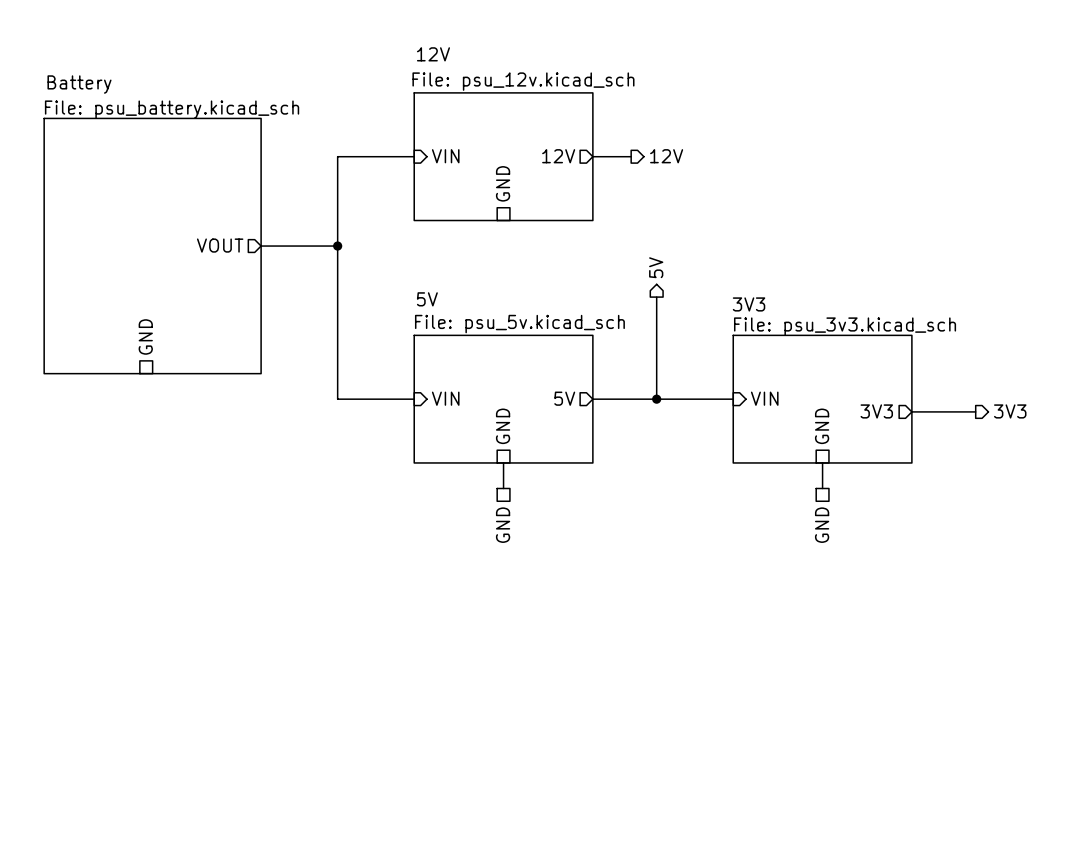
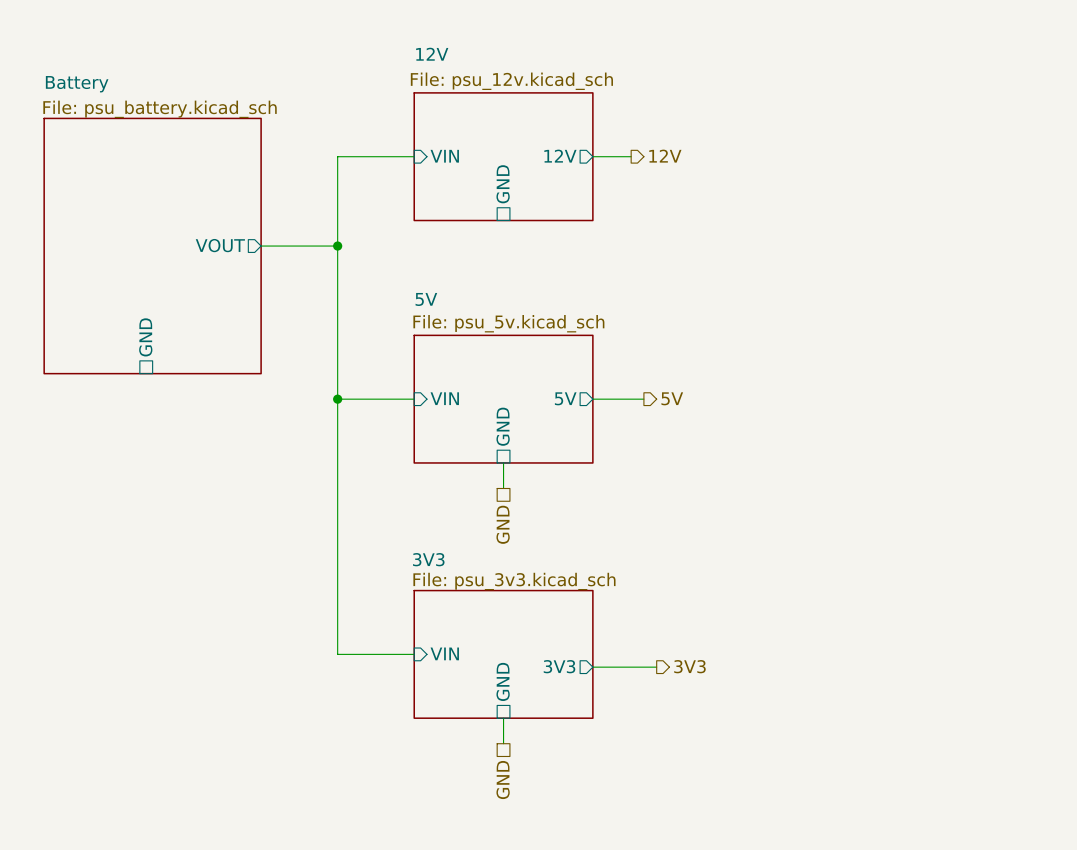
hierarchical label rotation: 0° (656, 267) -> 90° clockwise (672, 398)
hierarchical label position: 5V (656, 267) -> 5V (672, 398)
wire: (656, 297) (656, 399) -> none
sheet pin: VIN (764, 398) -> none
wire: none -> (337, 399) (337, 654) (414, 654)
junction: none -> (337, 399)
wire: (643, 399) (733, 399) -> none
junction: (656, 399) -> none
sheet 3V3 position: (822, 399) -> (503, 654)
sheet pin: 3V3 (876, 411) -> none
wire: (911, 411) (975, 411) -> none
hierarchical label: 3V3 (1010, 411) -> none
sheet pin: GND (822, 426) -> none
wire: (822, 462) (822, 488) -> none
hierarchical label: GND (822, 525) -> none
sheet pin: none -> VIN (444, 653)
sheet pin: none -> 3V3 (559, 666)
hierarchical label: none -> 3V3 (689, 666)
wire: none -> (592, 667) (656, 667)
sheet pin: none -> GND (503, 681)
wire: none -> (503, 718) (503, 743)
hierarchical label: none -> GND (503, 780)

